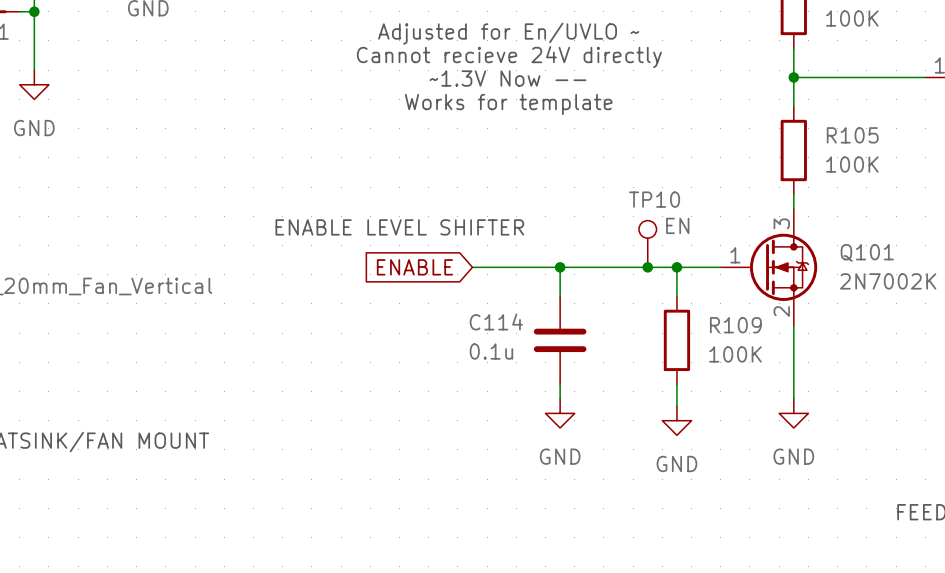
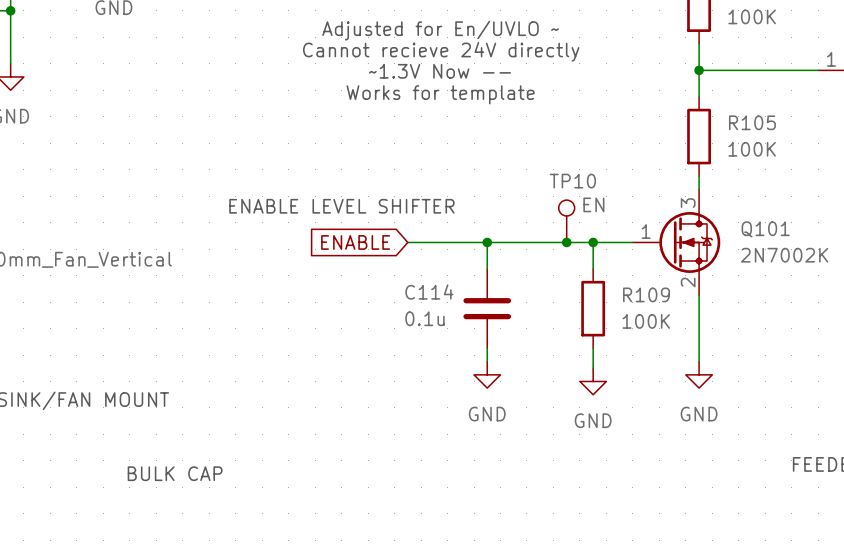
text: none -> BULK CAP (175, 473)

